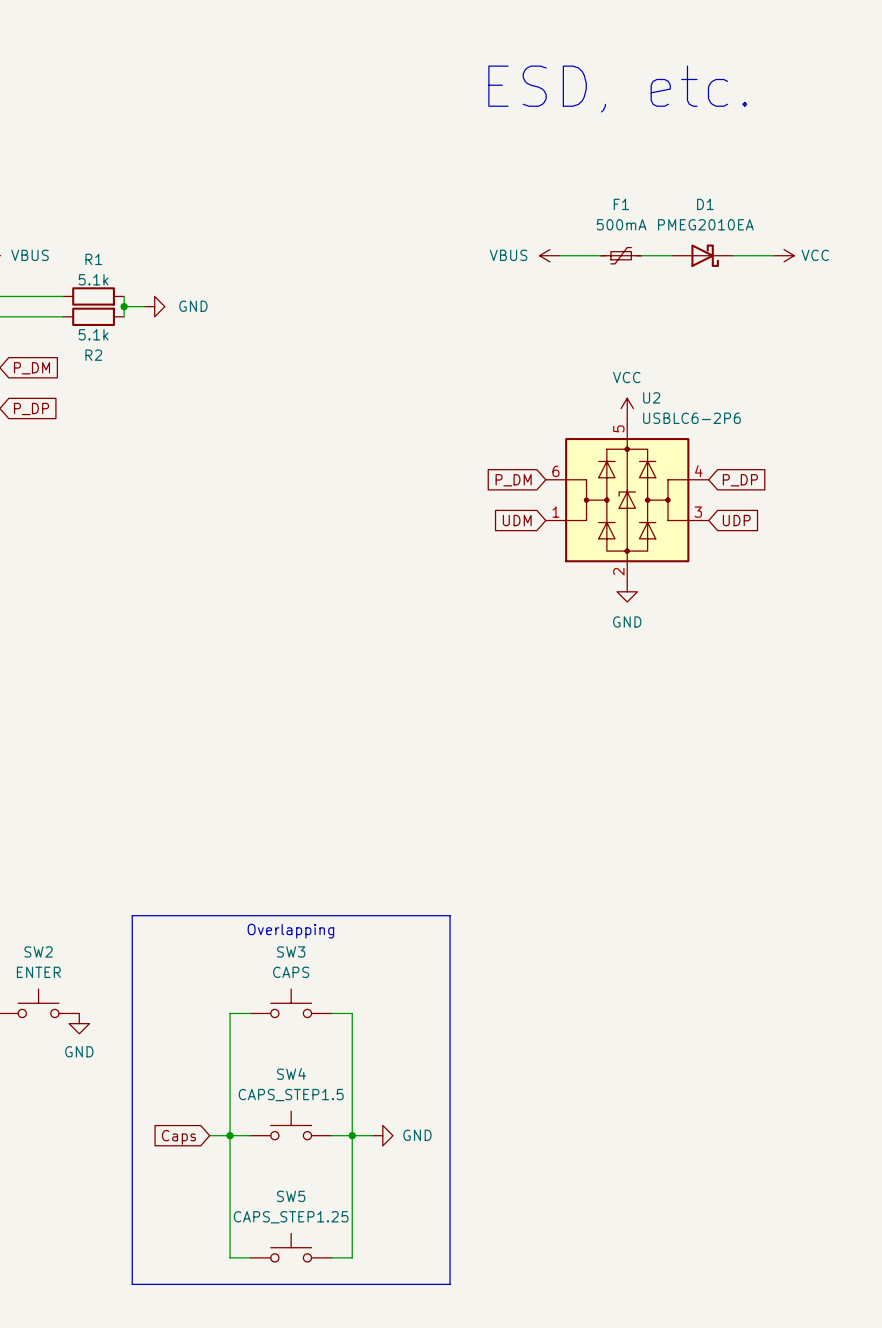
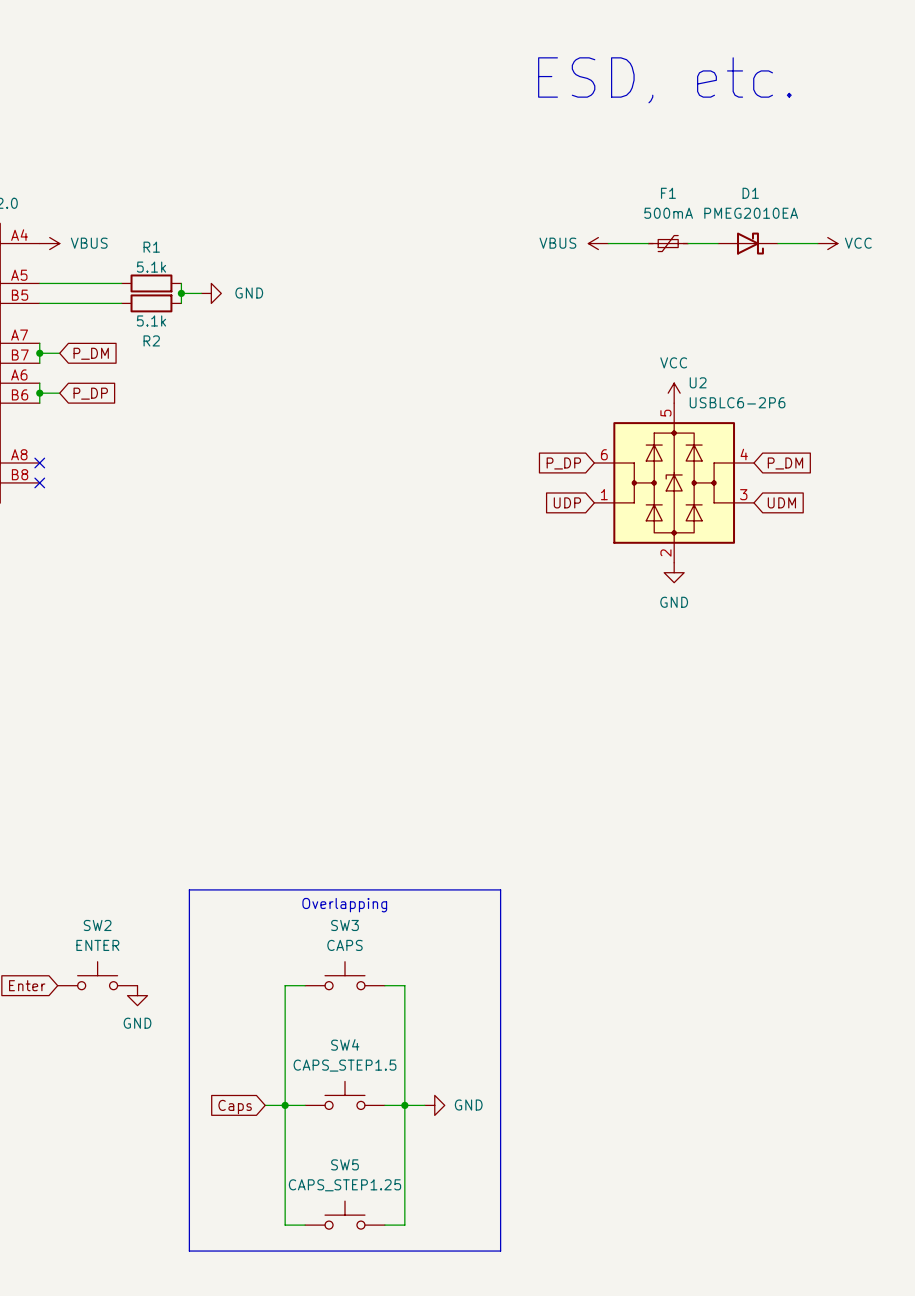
global label: P_DM (513, 480) -> P_DP (563, 463)
global label: P_DP (740, 480) -> P_DM (785, 463)
global label: UDM (517, 520) -> UDP (567, 502)
global label: UDP (736, 520) -> UDM (781, 502)

